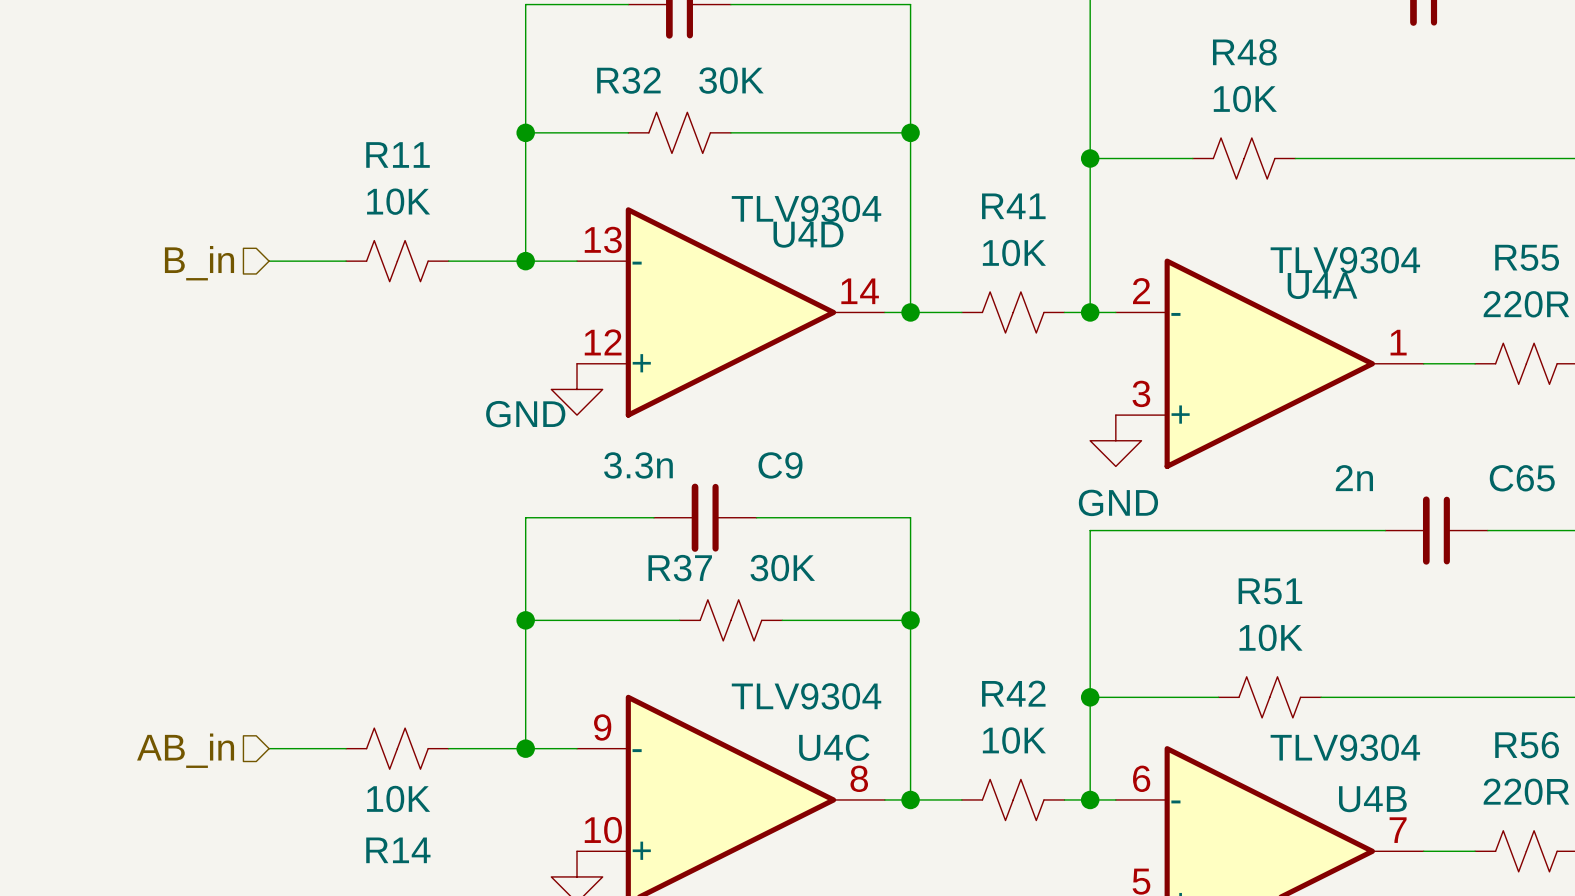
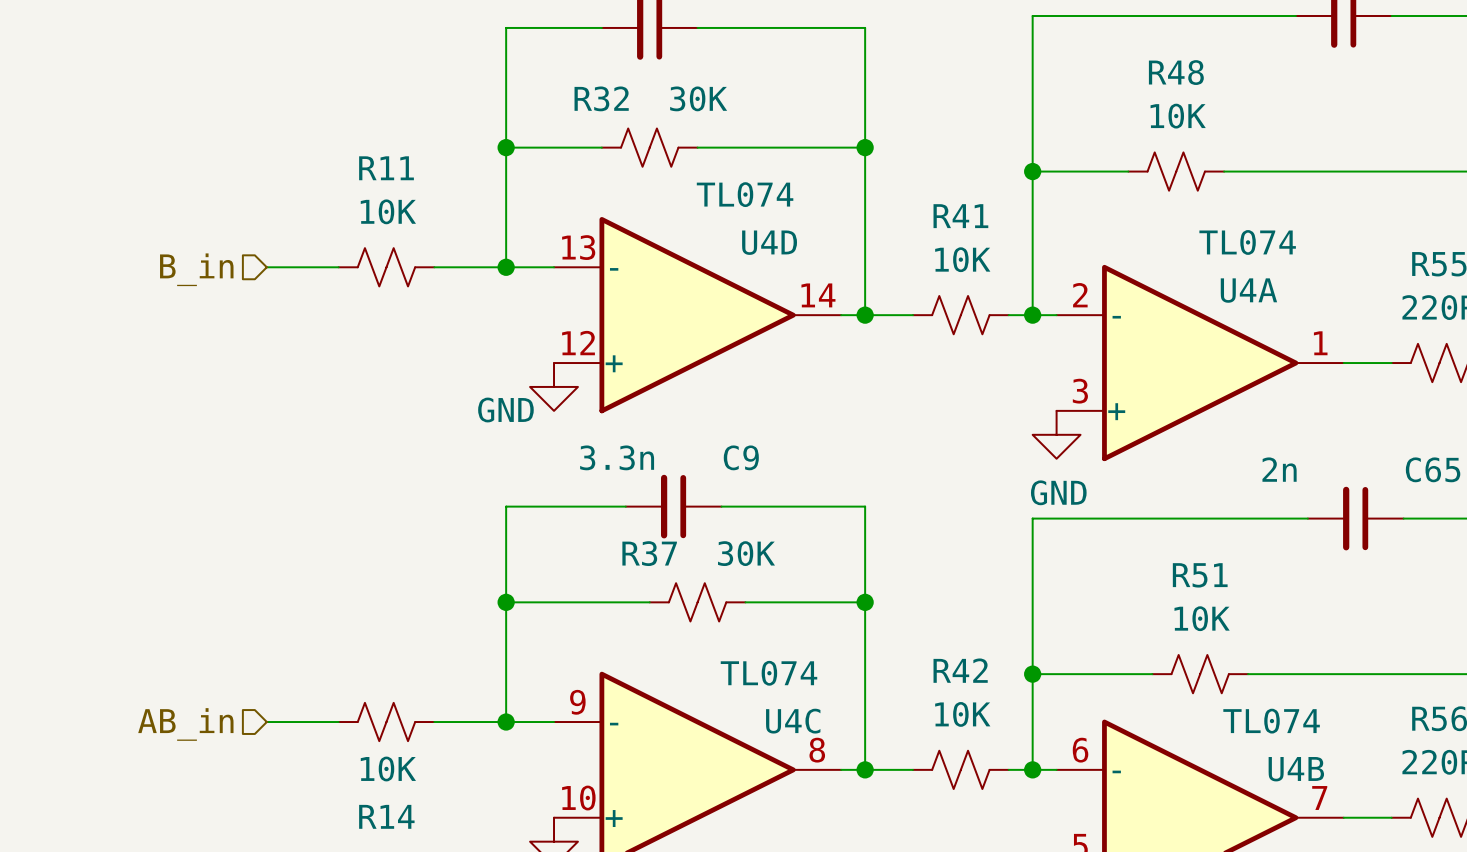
U4D value: TLV9304 (806, 208) -> TL074 (745, 194)
U4A value: TLV9304 (1345, 260) -> TL074 (1247, 242)
U4C value: TLV9304 (806, 696) -> TL074 (768, 673)
U4B value: TLV9304 (1345, 747) -> TL074 (1271, 721)

